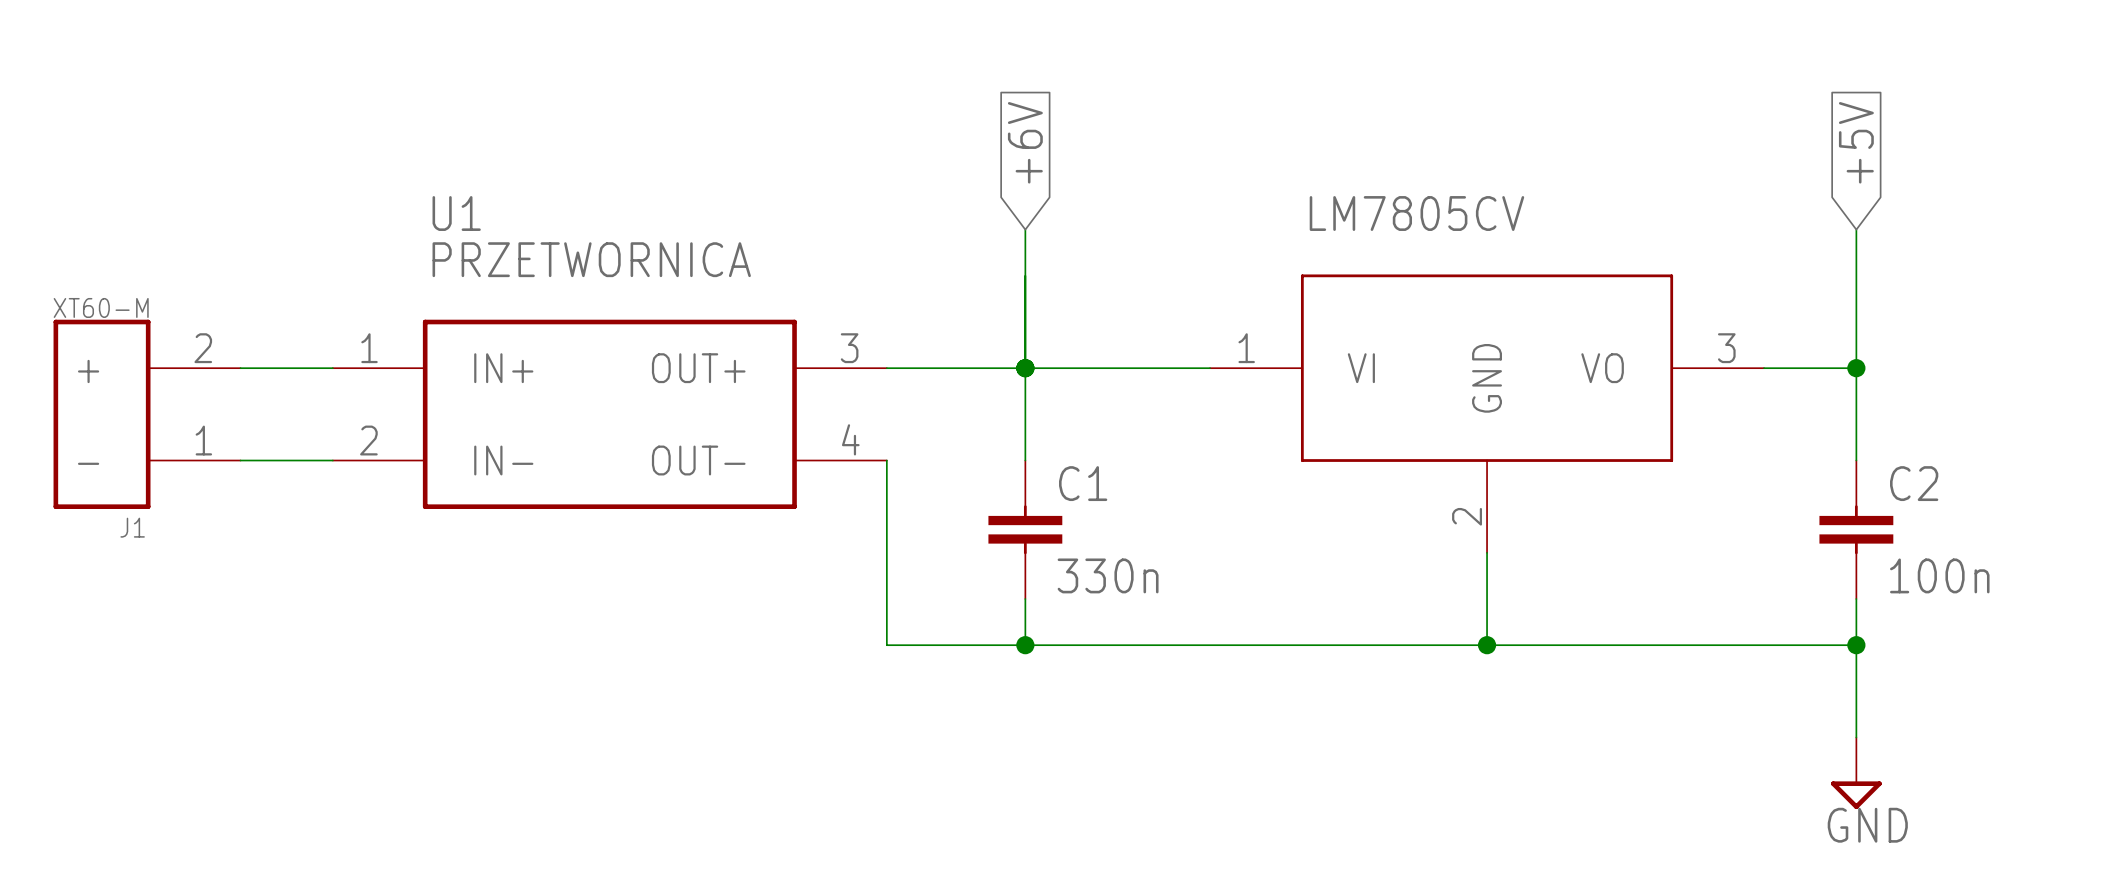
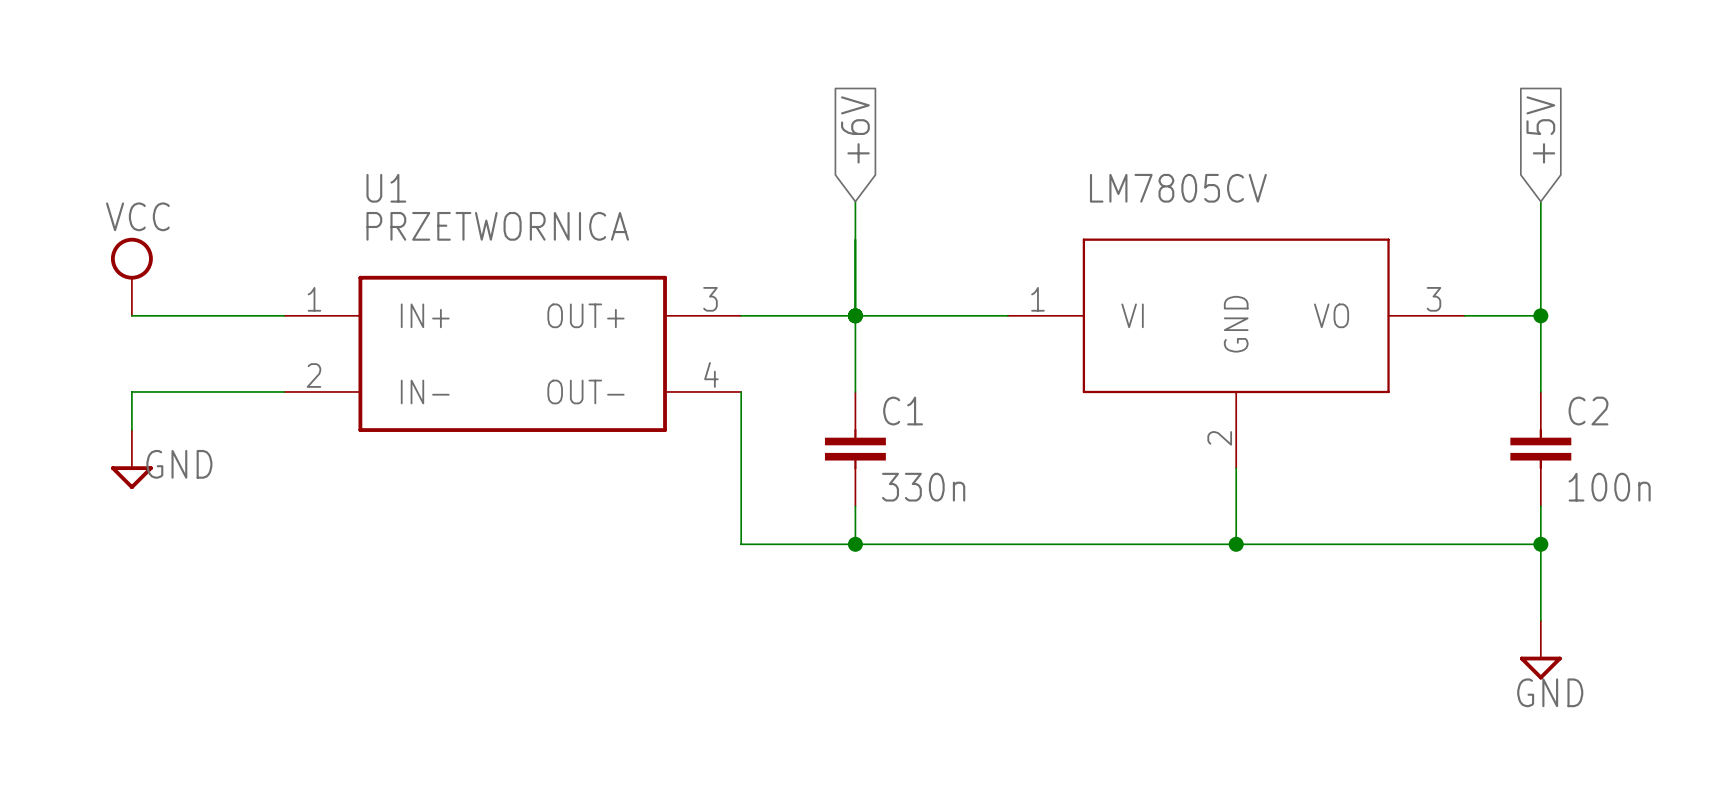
power symbol: none -> VCC (131, 276)
J1: XT60-M (147, 414) -> none
power symbol: none -> GND (131, 459)

